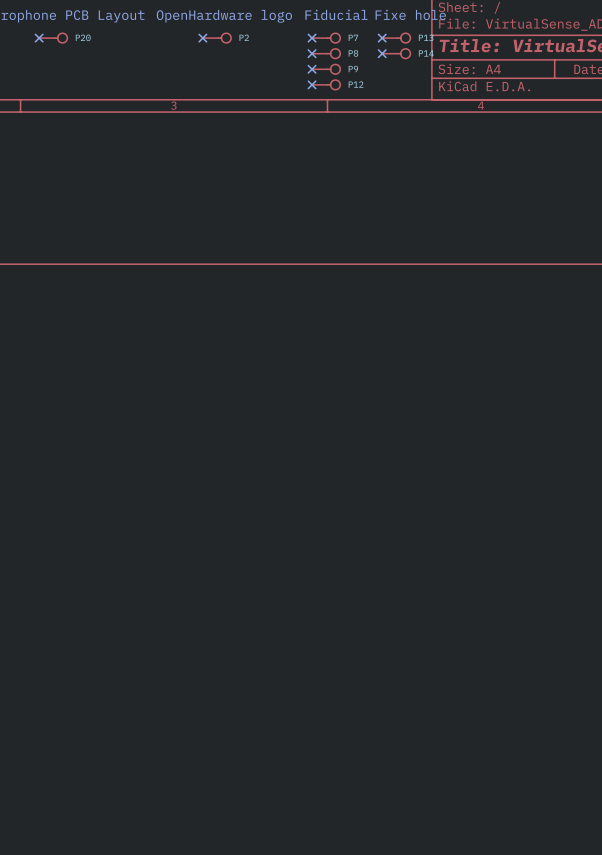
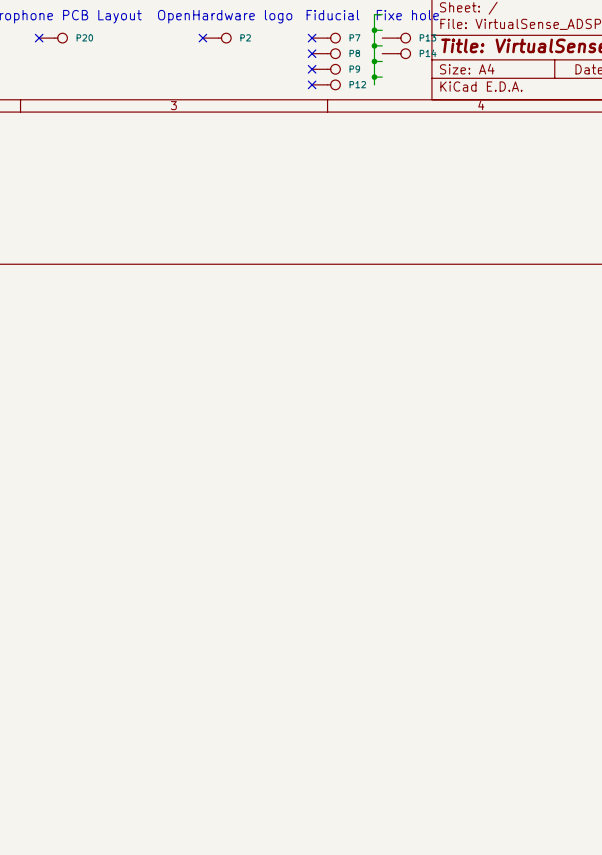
wire: none -> (382, 14) (374, 14) (374, 84)
wire: none -> (374, 30) (382, 30)
junction: none -> (374, 30)
no-connect mark: (382, 38) -> none
wire: none -> (374, 45) (382, 45)
junction: none -> (374, 45)
no-connect mark: (382, 53) -> none
wire: none -> (374, 61) (382, 61)
junction: none -> (374, 61)
wire: none -> (374, 77) (382, 77)
junction: none -> (374, 77)

